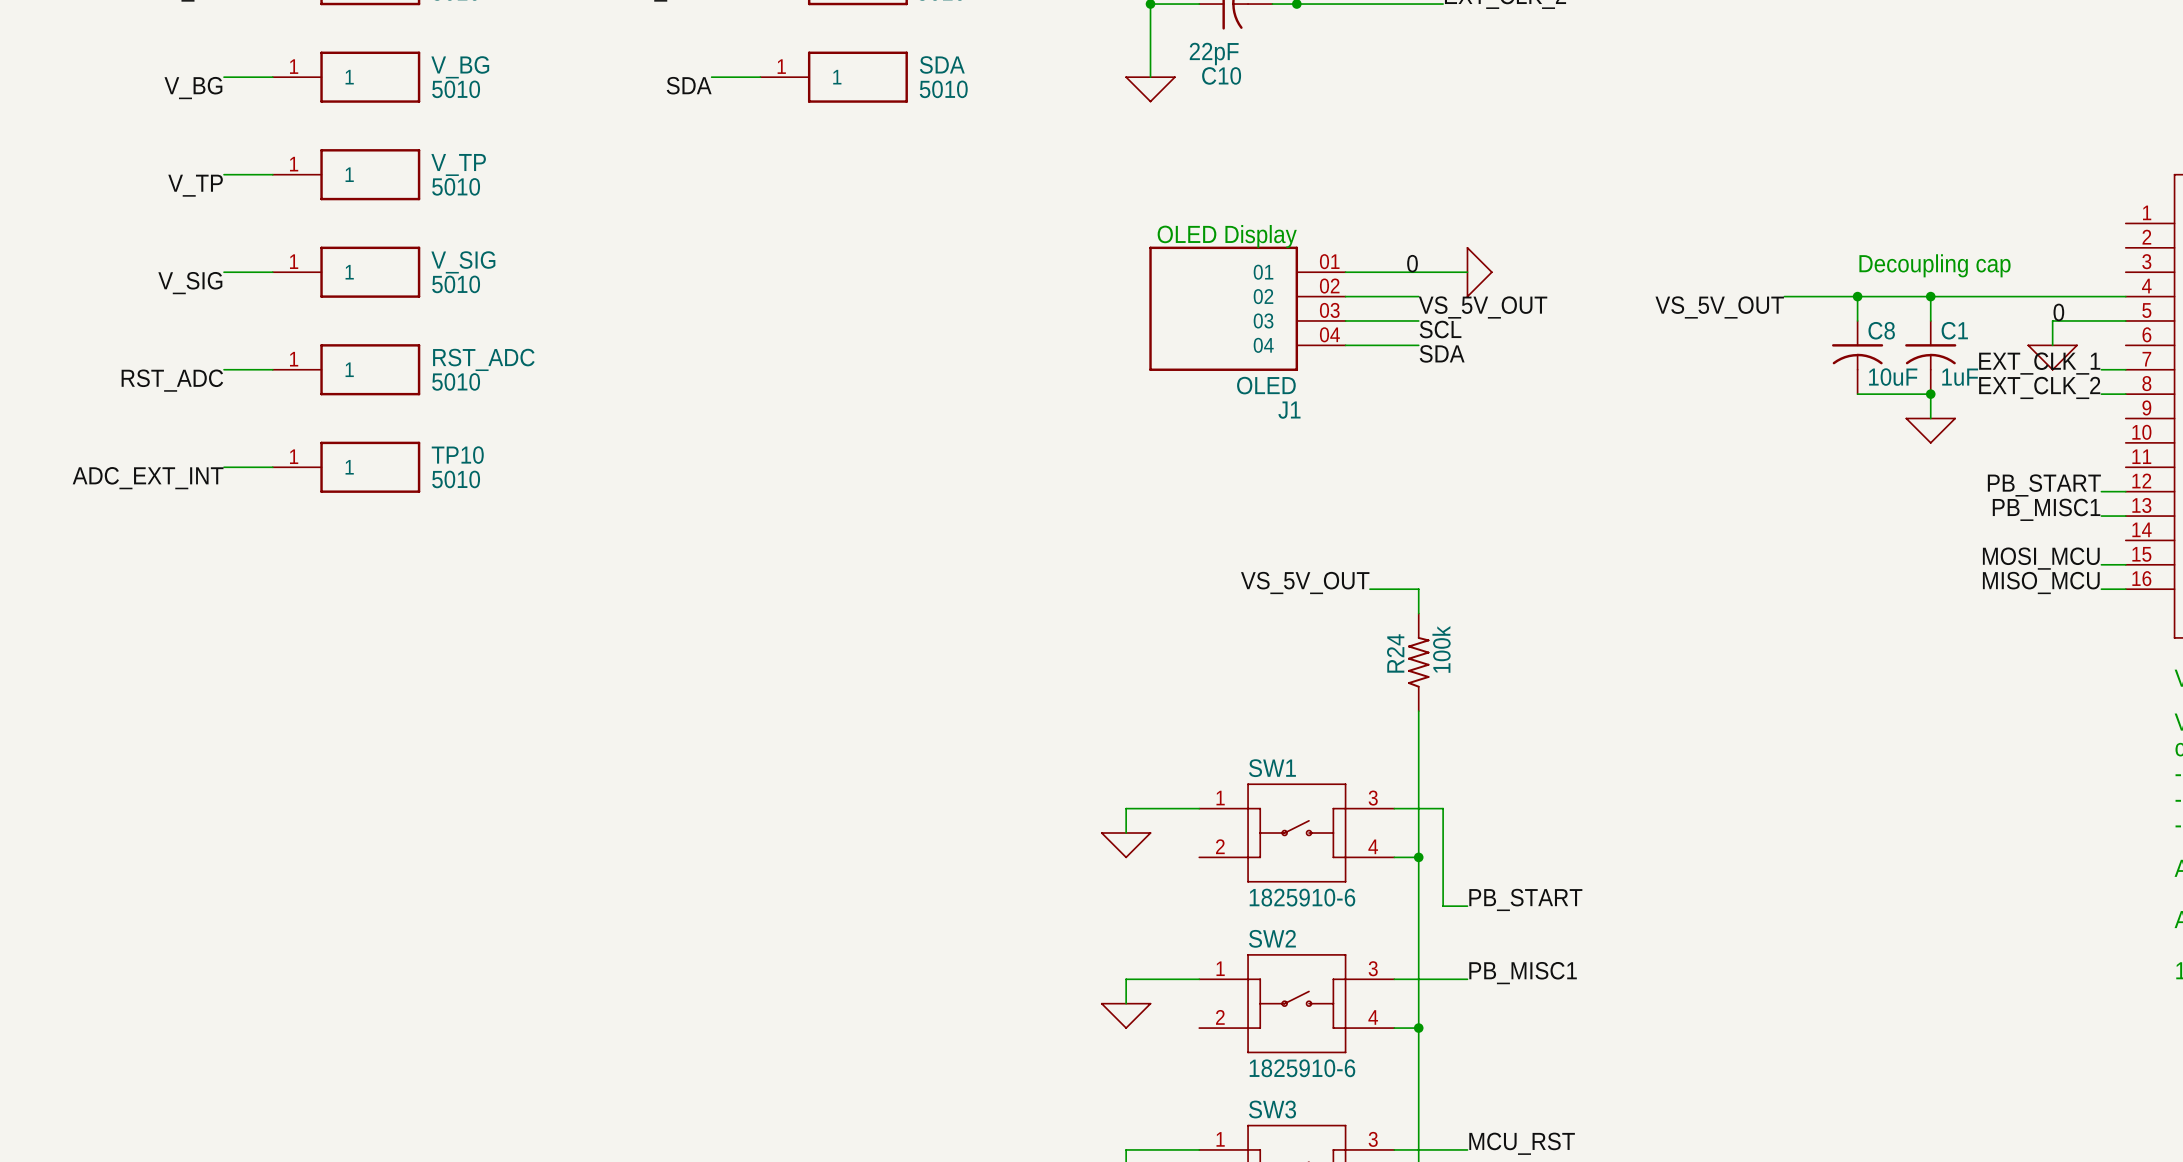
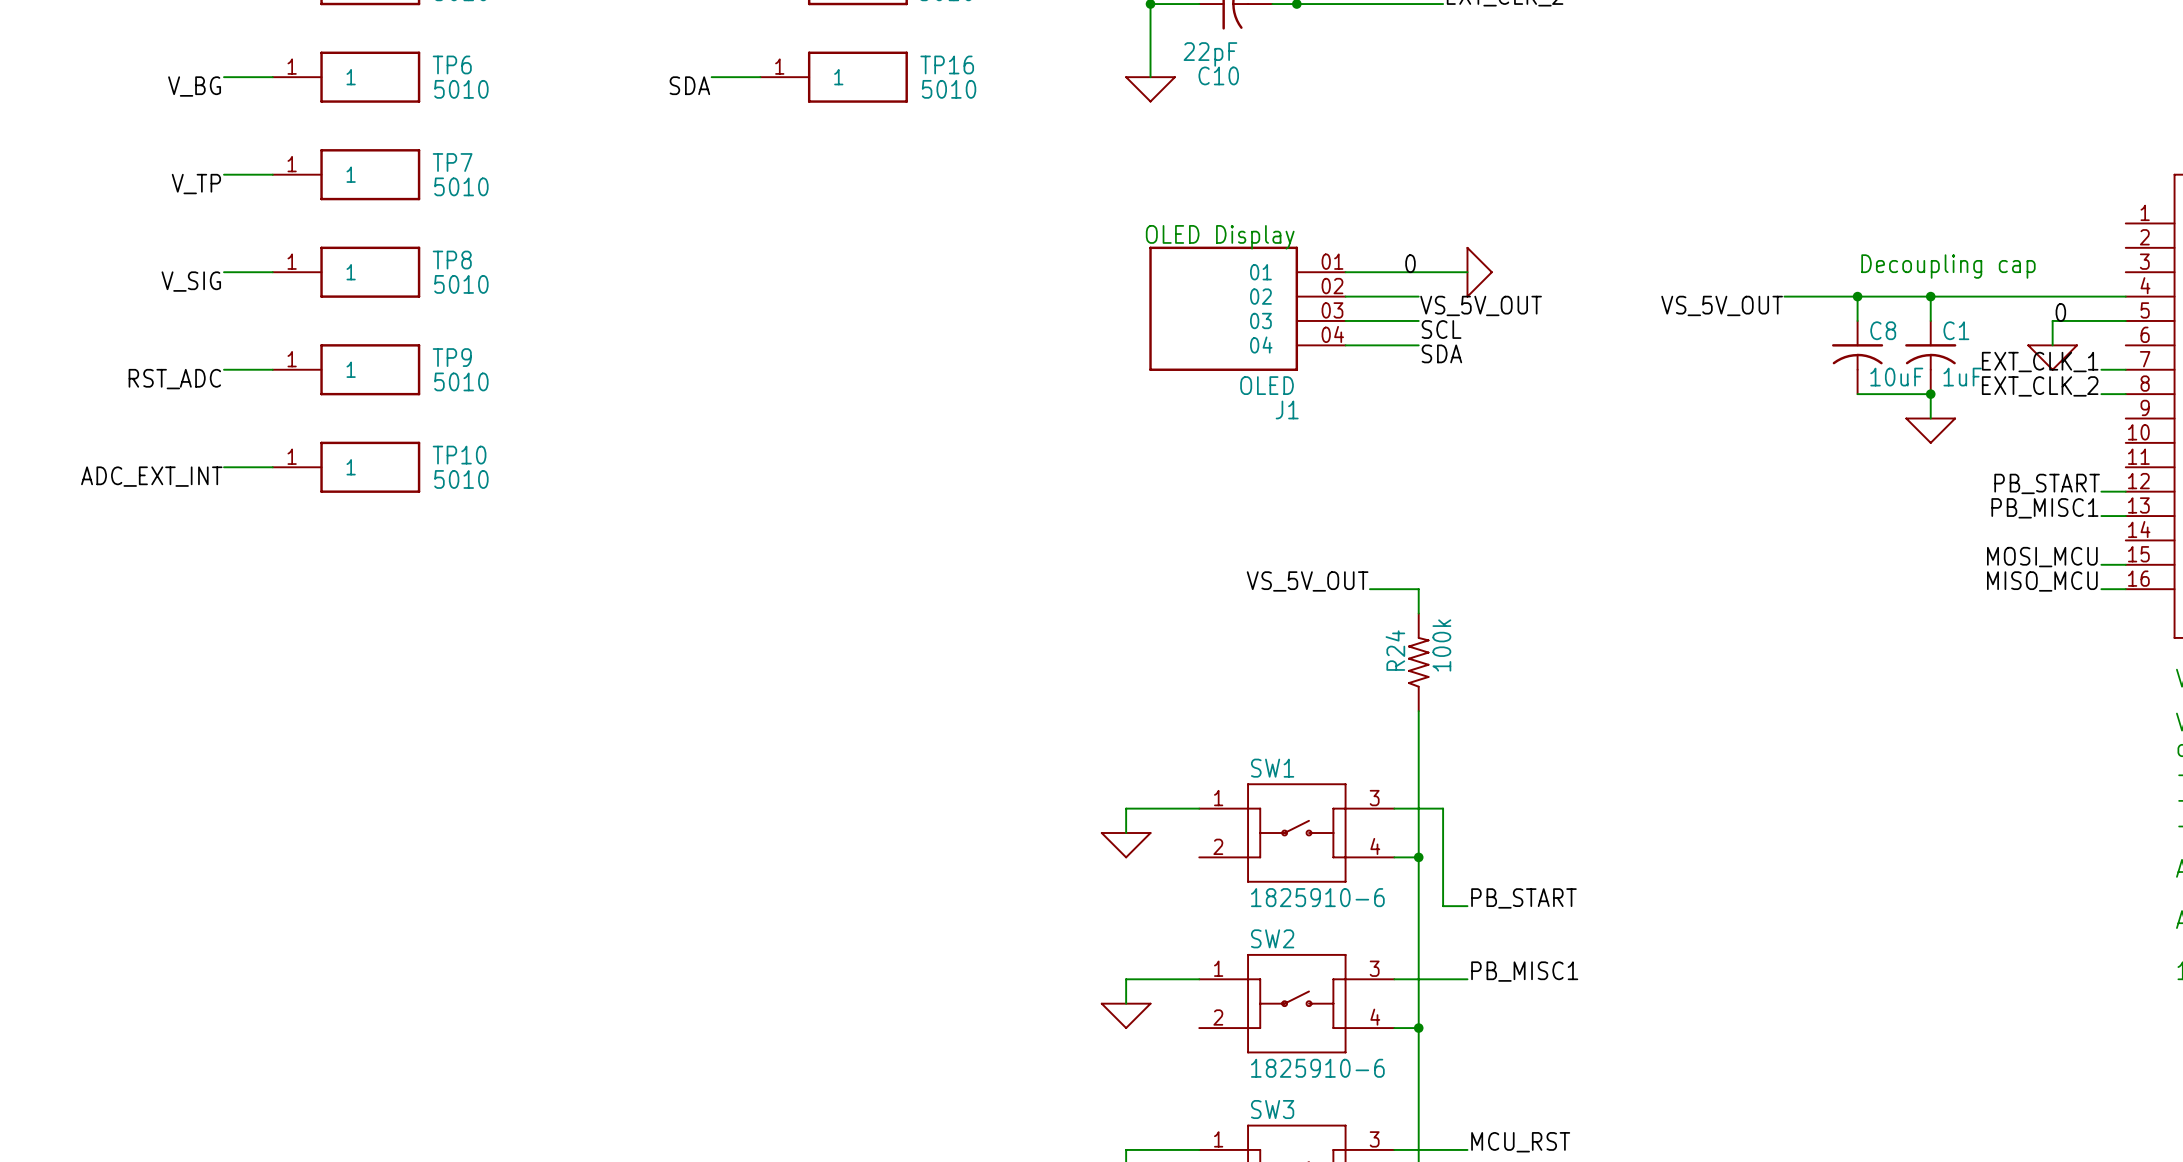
SDA name: SDA (942, 64) -> TP16 (947, 64)
V_BG name: V_BG (460, 67) -> TP6 (452, 64)
V_TP name: V_TP (458, 164) -> TP7 (452, 162)
V_SIG name: V_SIG (463, 262) -> TP8 (452, 260)
RST_ADC name: RST_ADC (483, 359) -> TP9 (452, 357)

